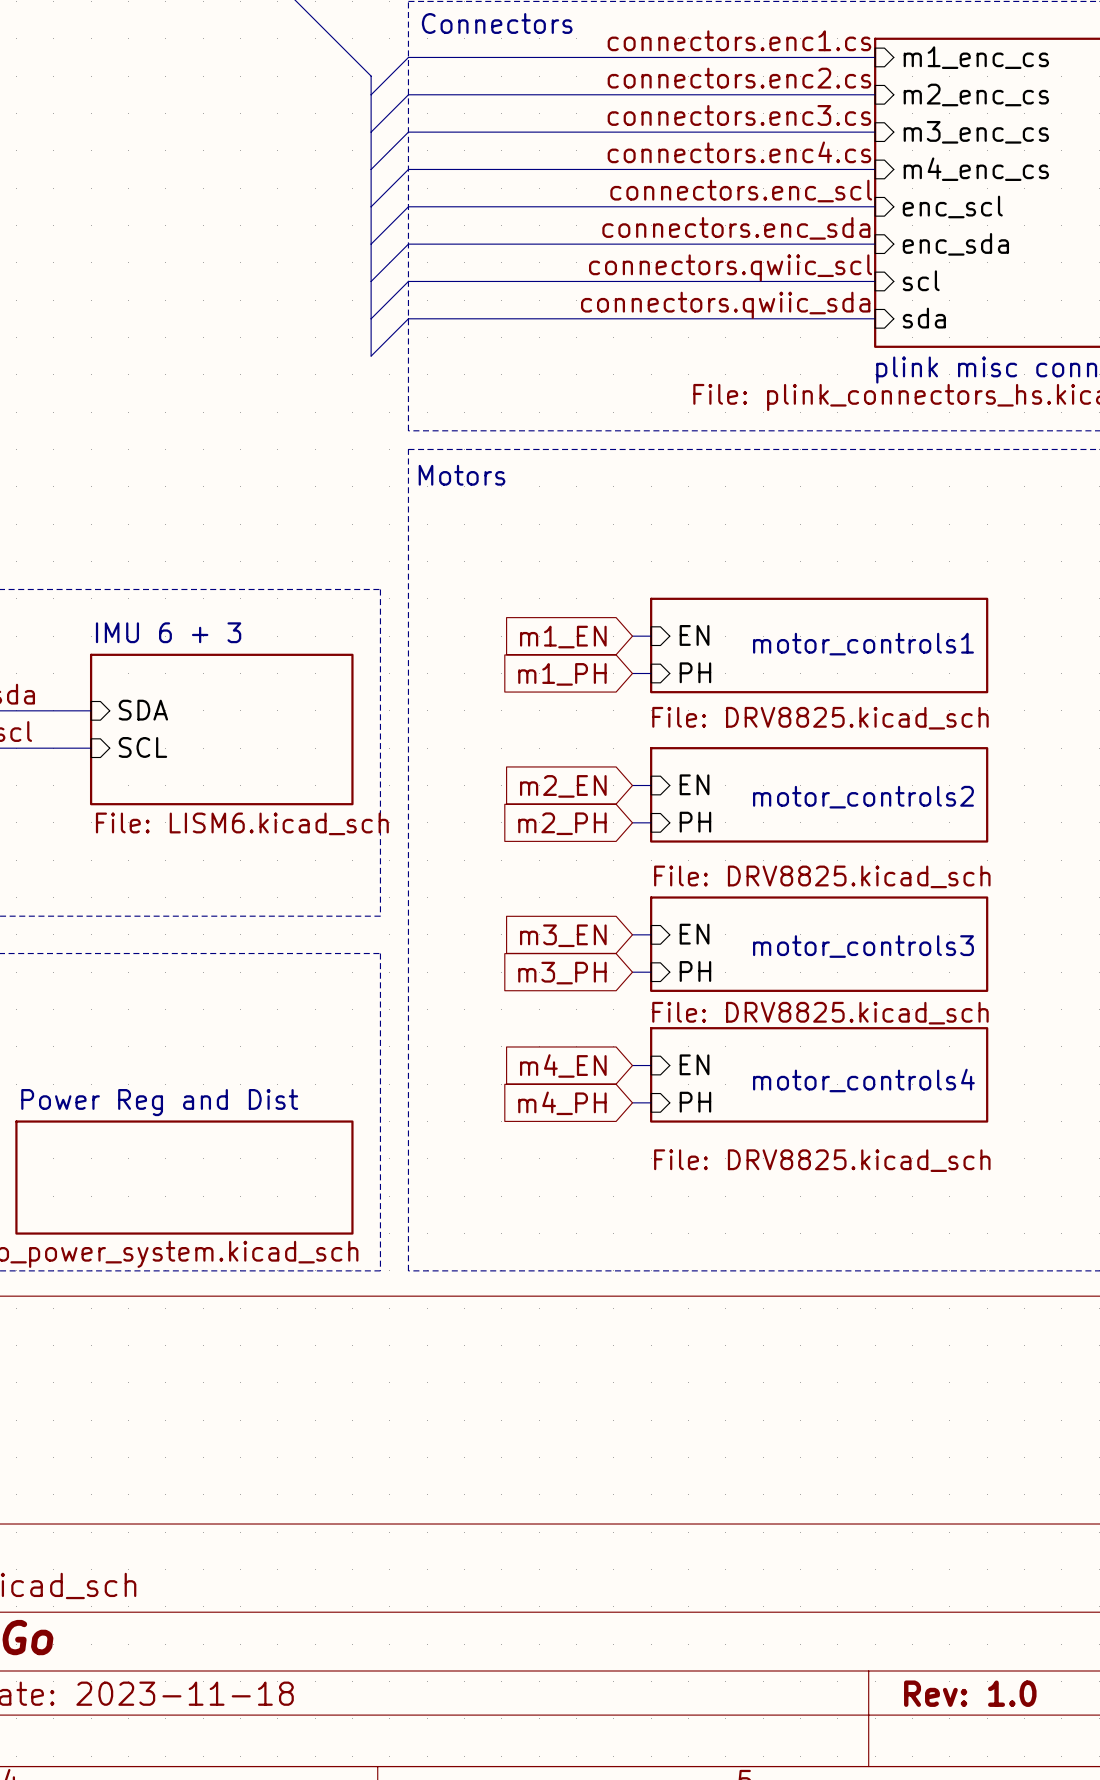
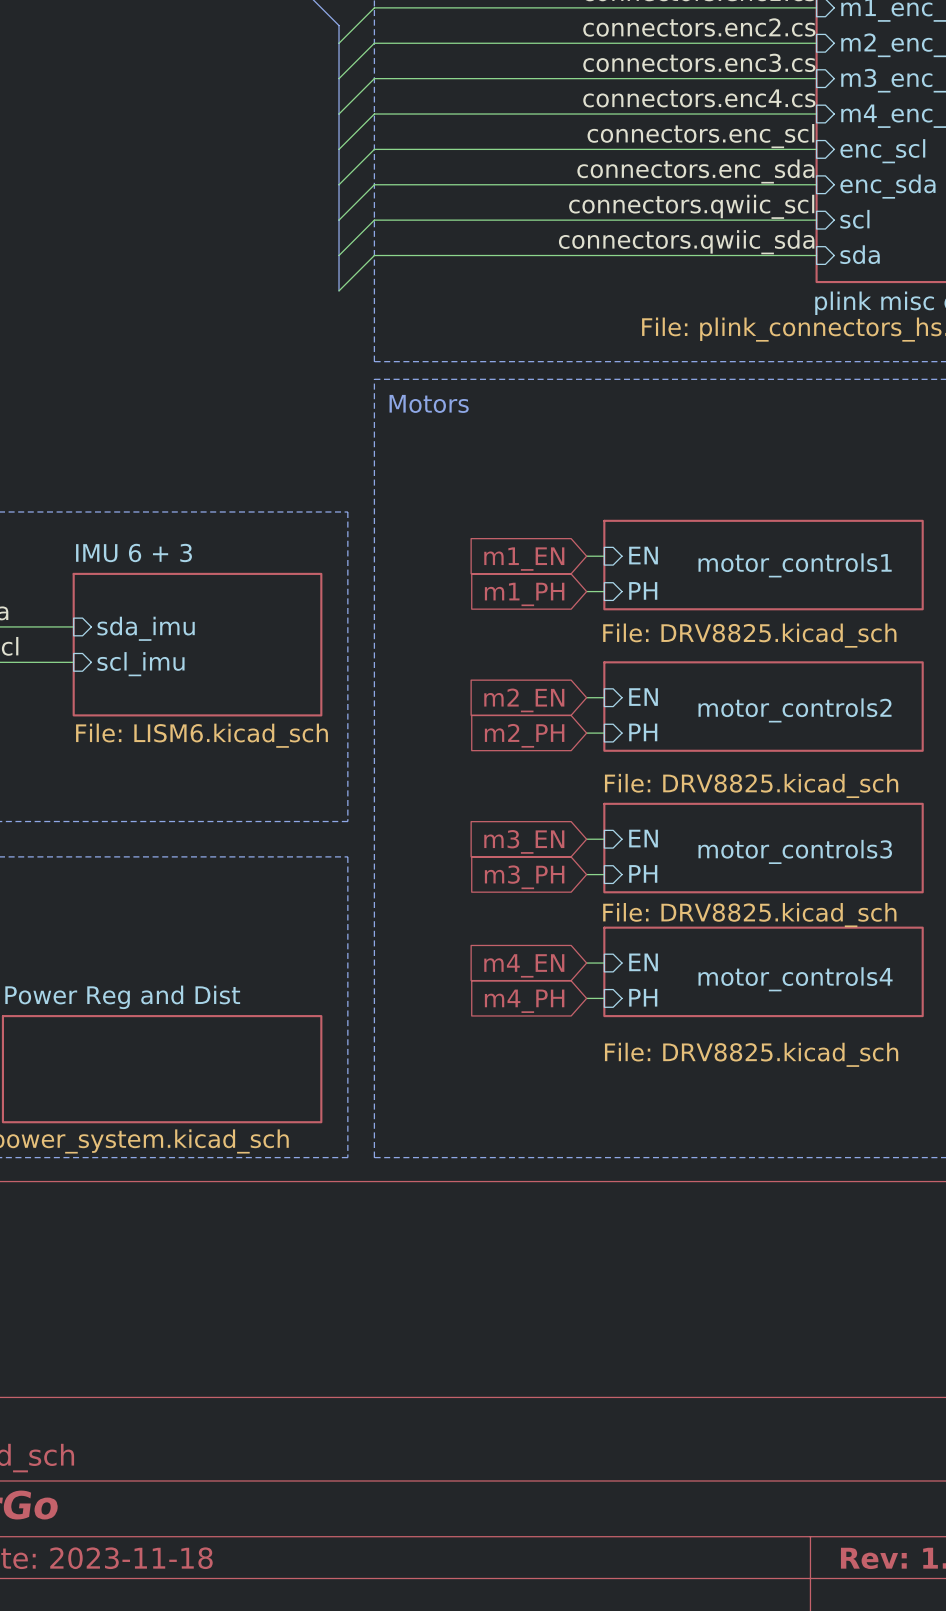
sheet pin: SDA (143, 710) -> sda_imu (146, 628)
sheet pin: SCL (142, 747) -> scl_imu (141, 664)

